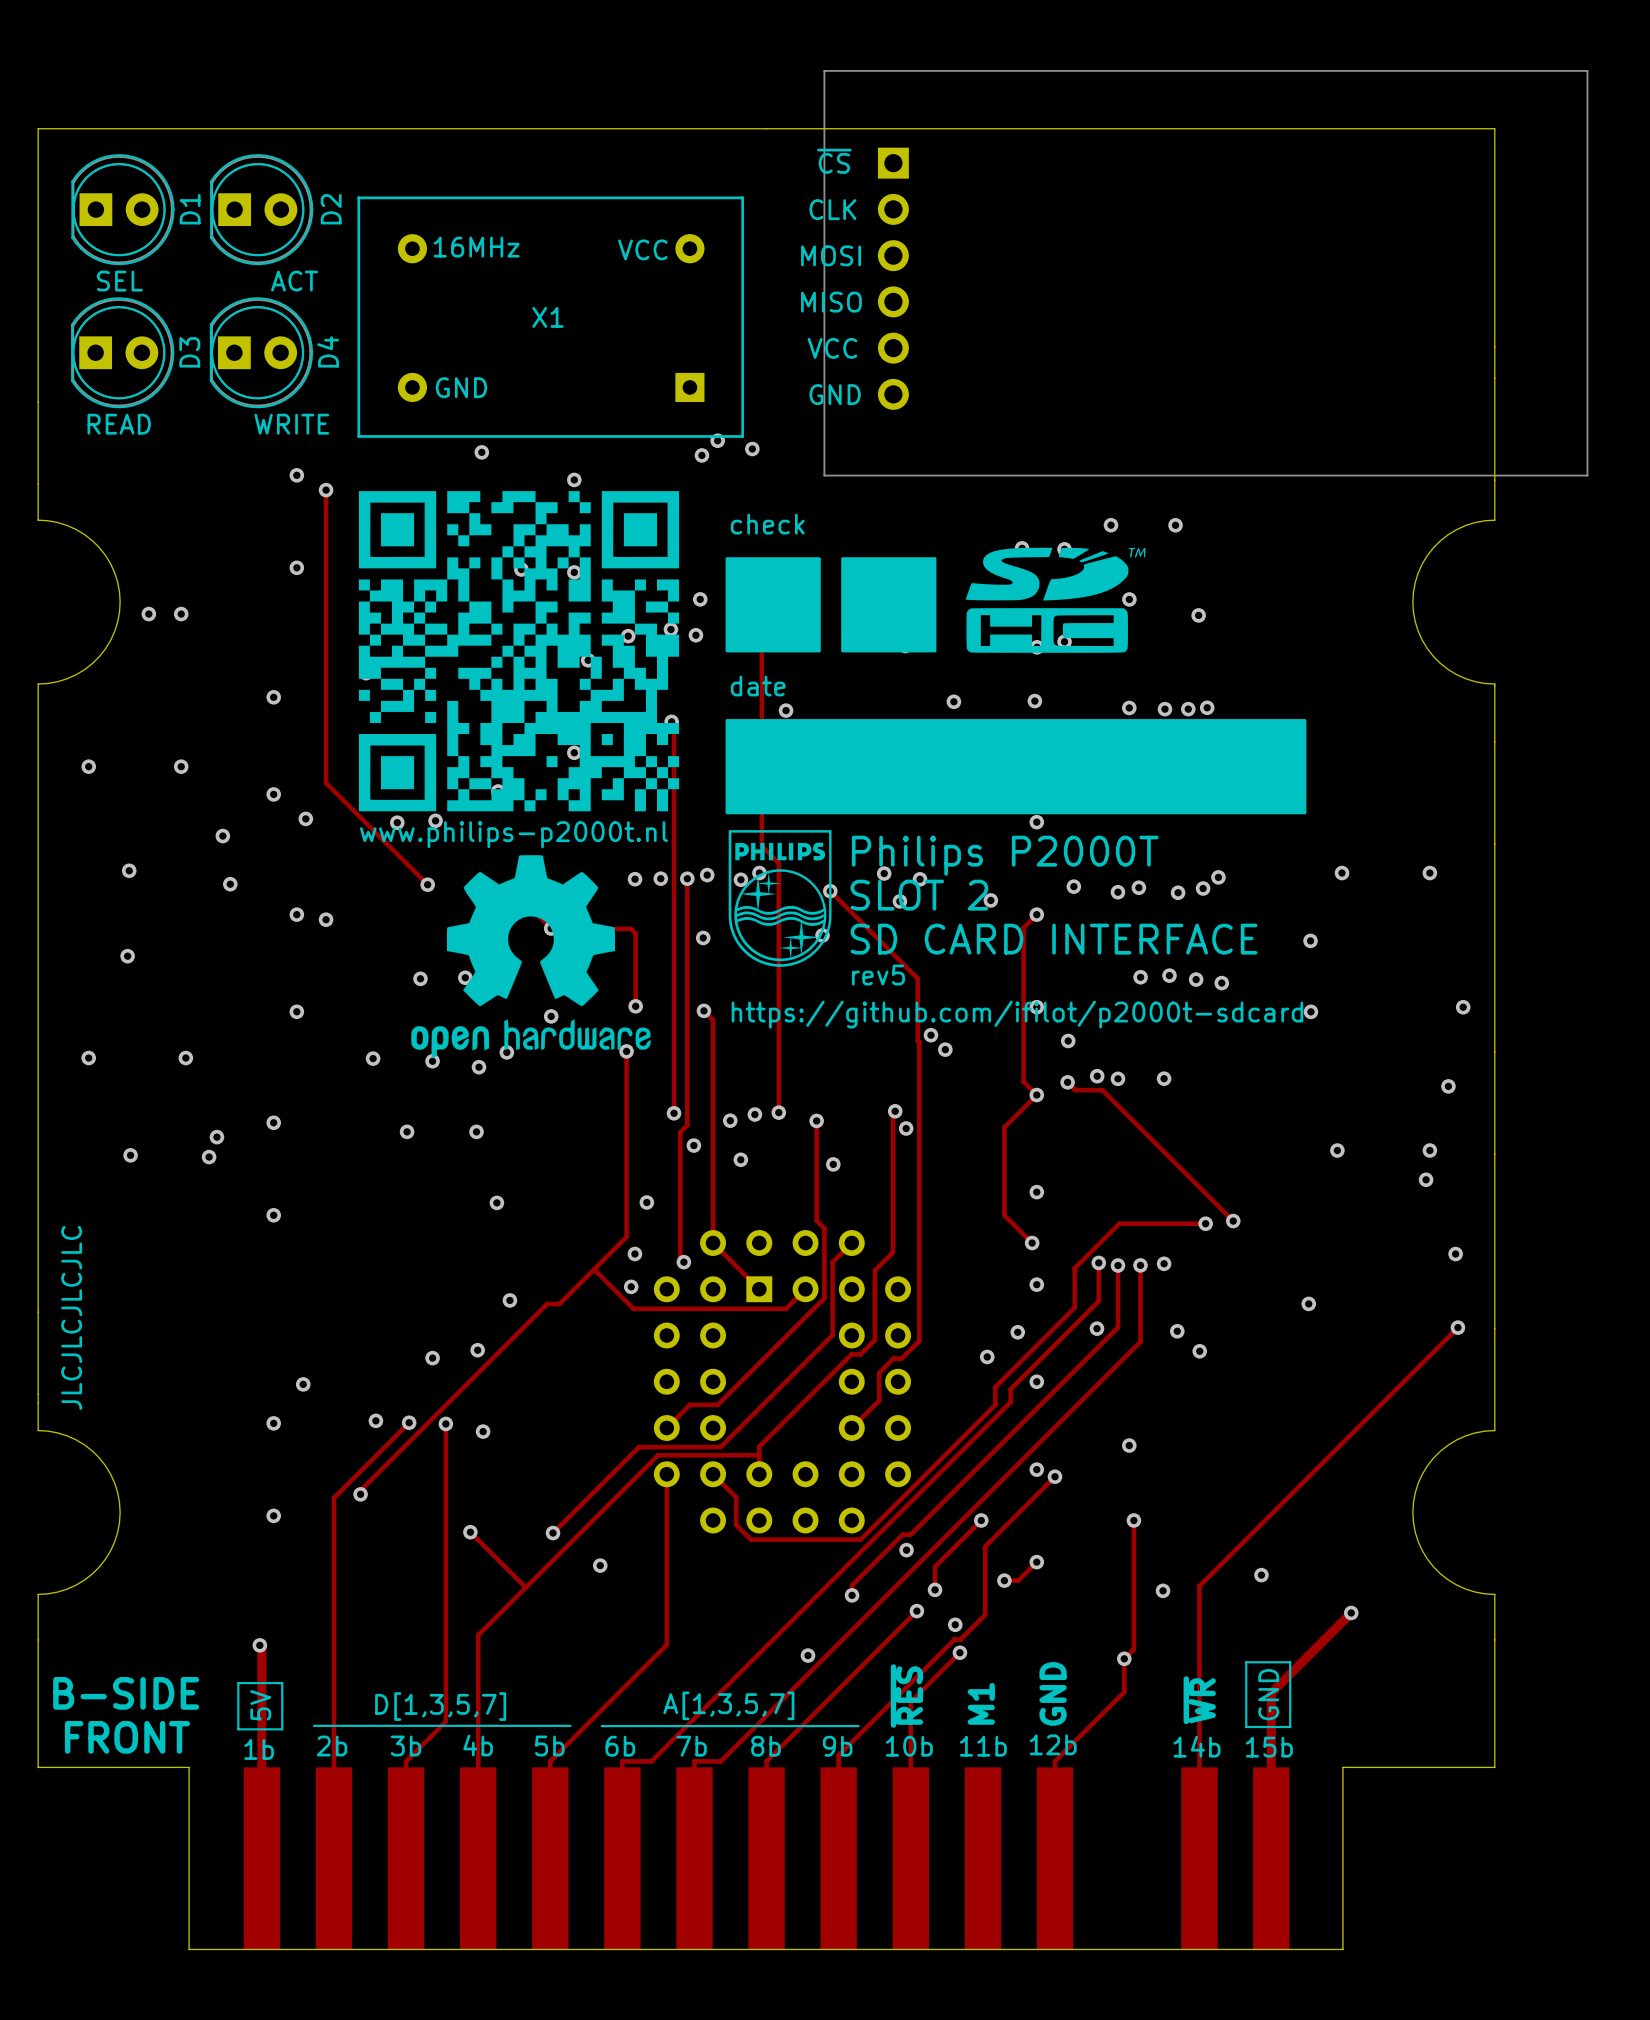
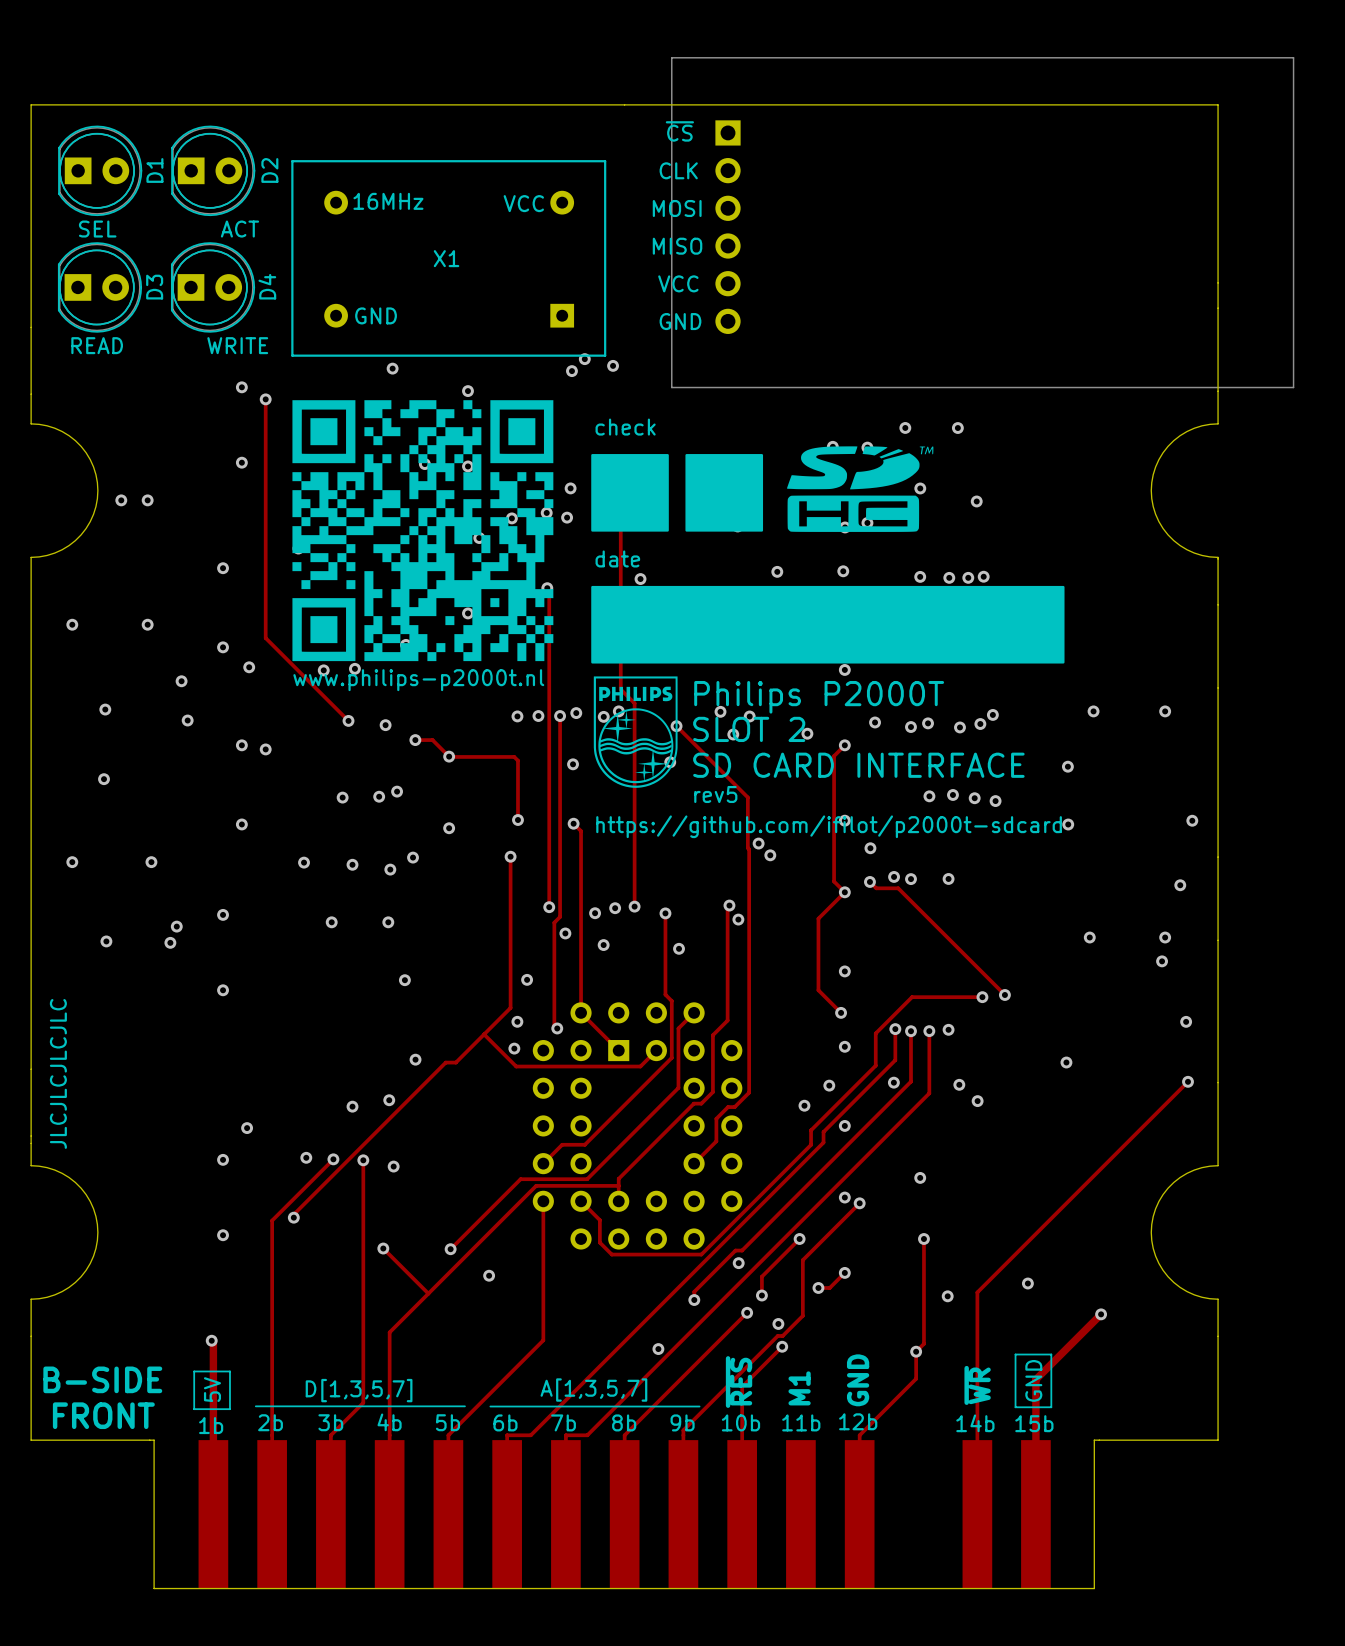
drawing: [411, 855, 651, 1058] -> none

